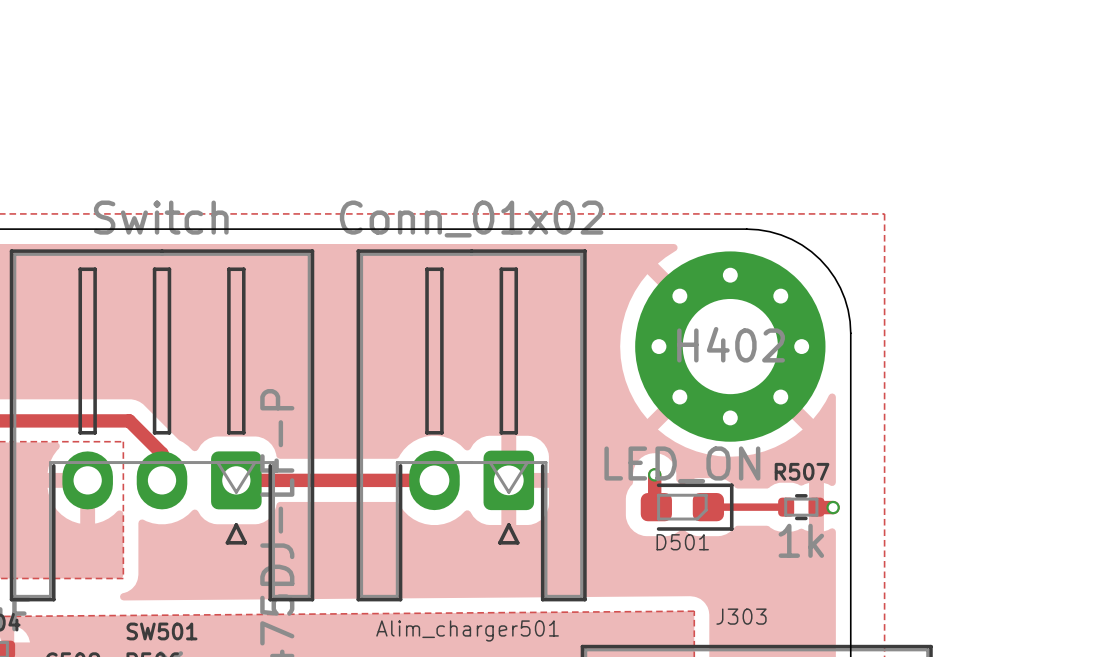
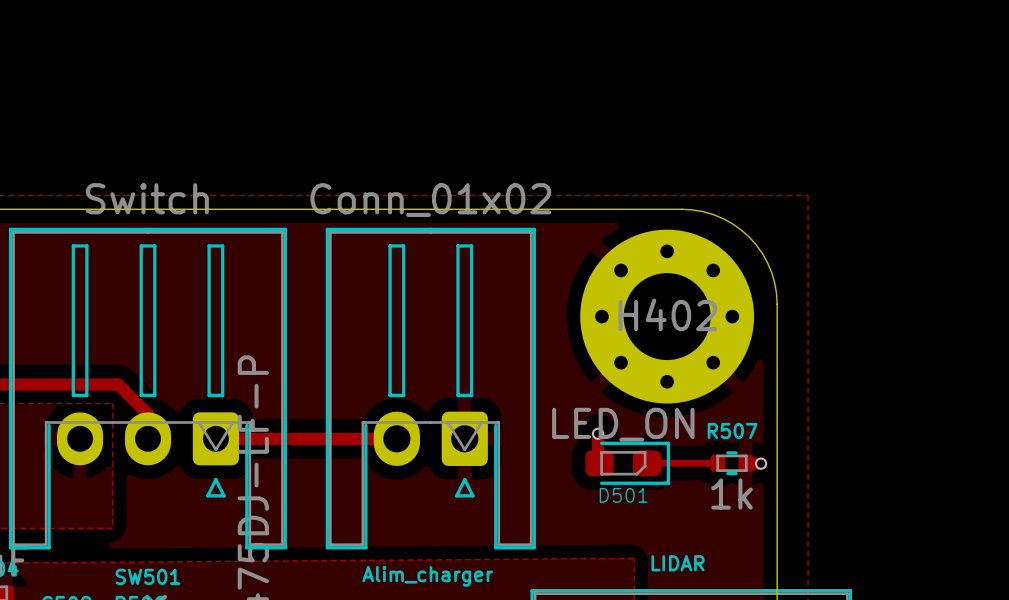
J303 name: J303 (741, 616) -> LIDAR (677, 563)
Alim_charger501 name: Alim_charger501 (467, 630) -> Alim_charger (427, 576)

